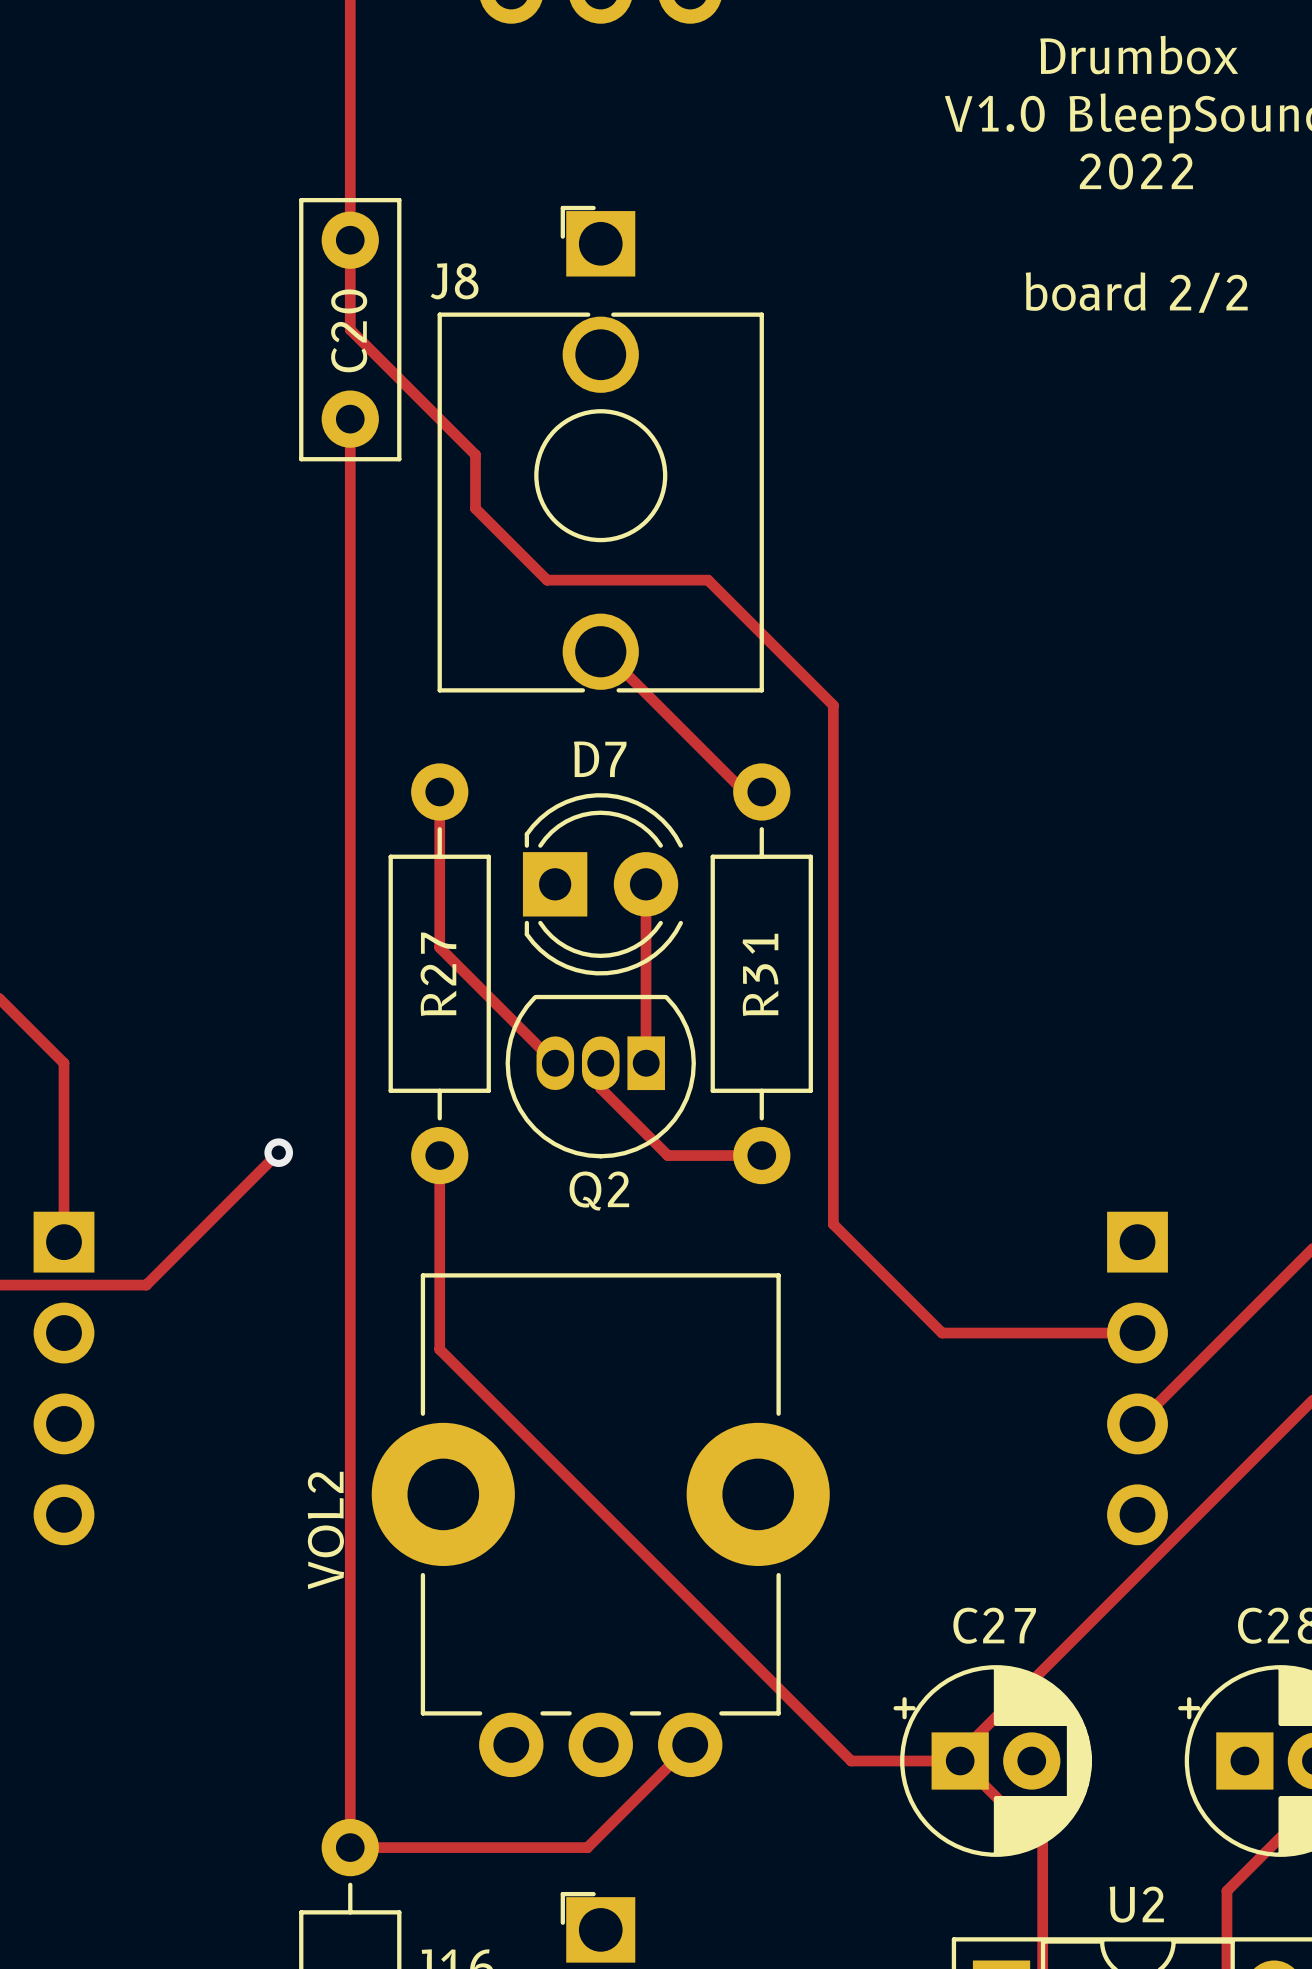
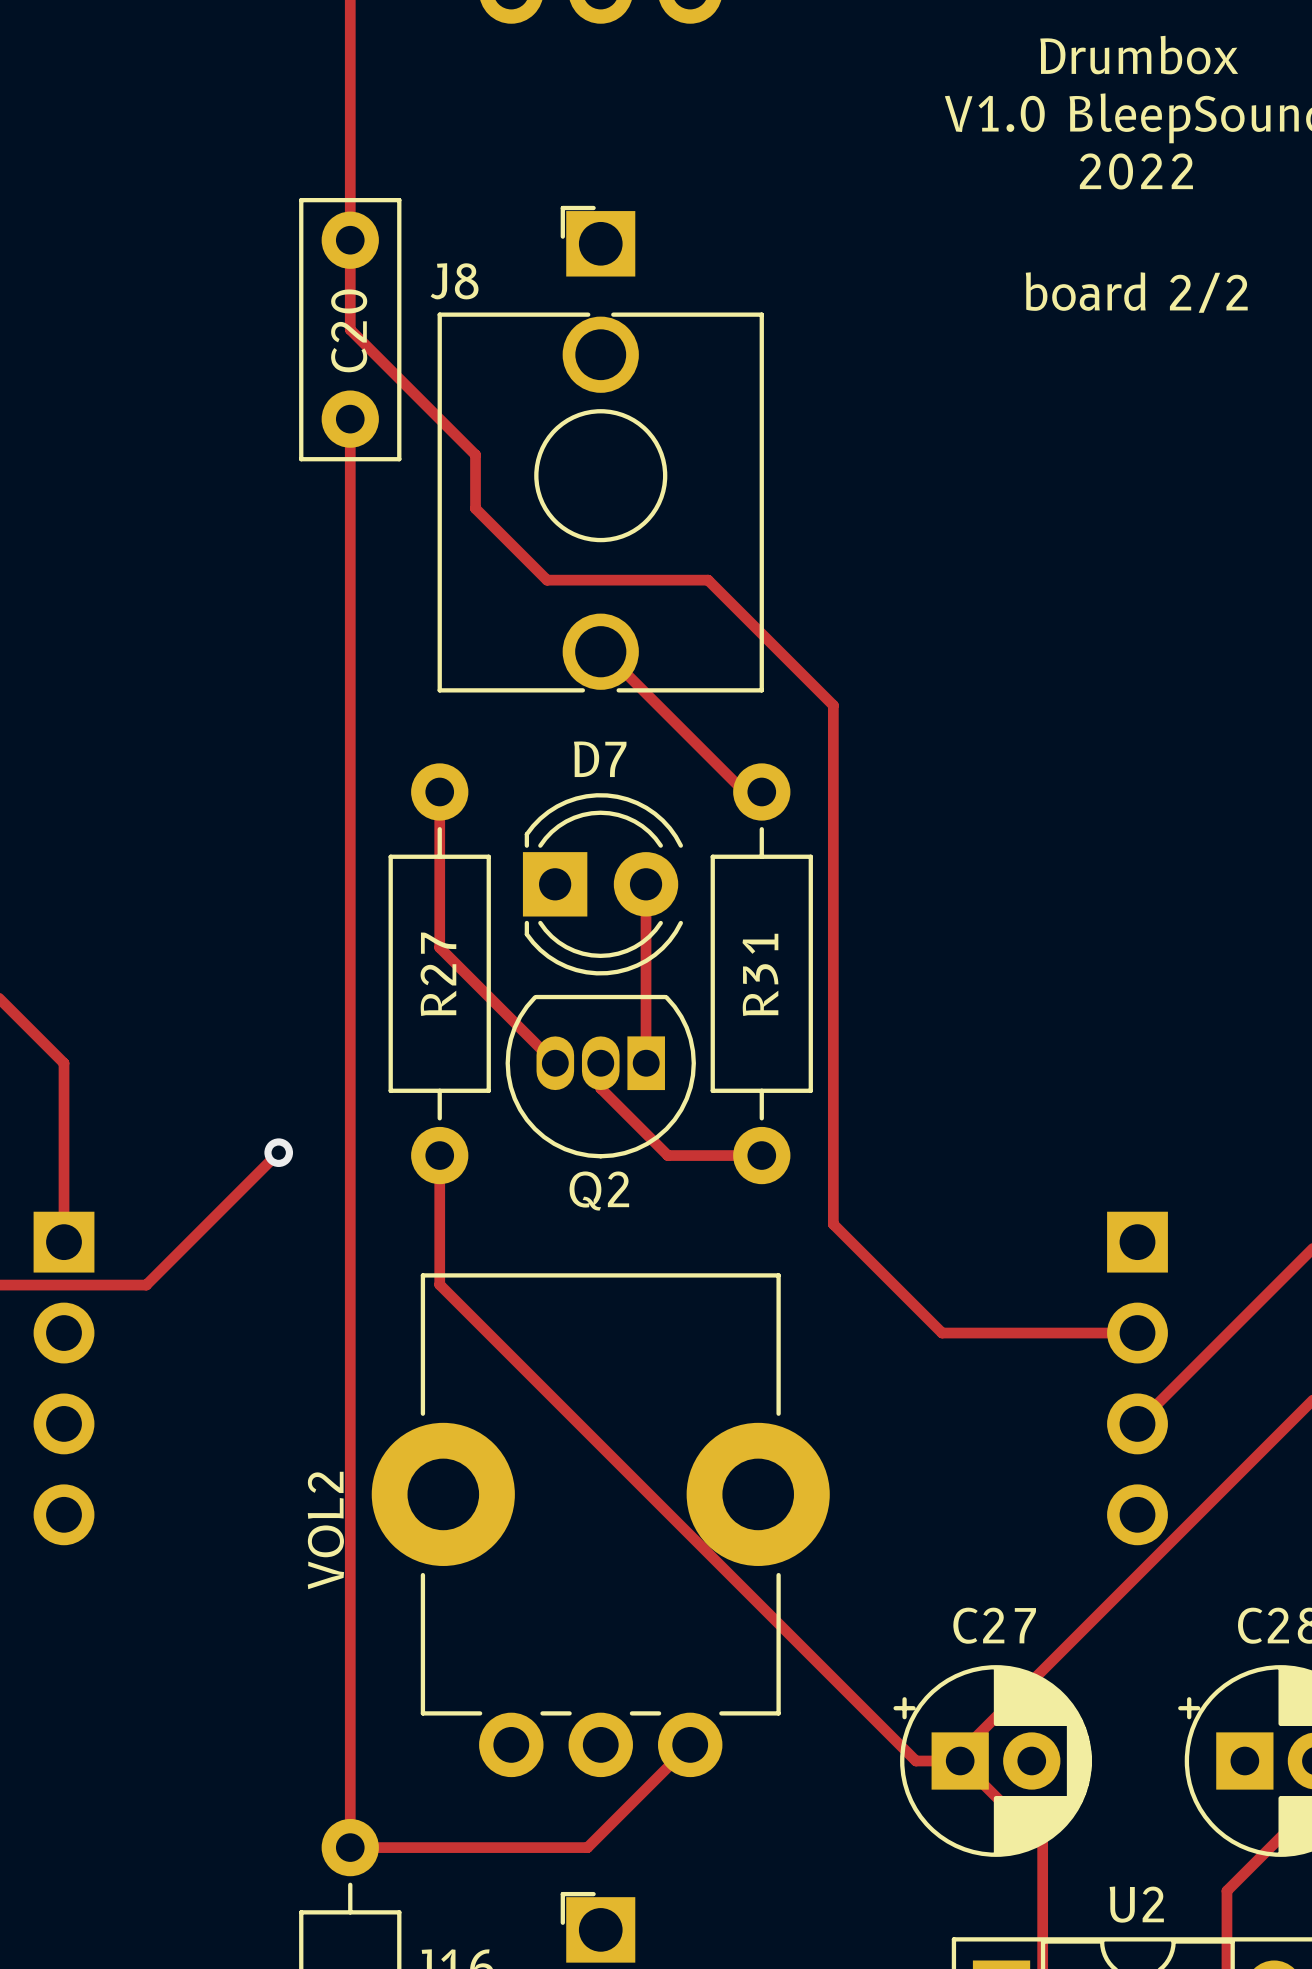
track: (439, 1284) (439, 1349) (851, 1761) (915, 1761) -> (439, 1284) (915, 1761)

